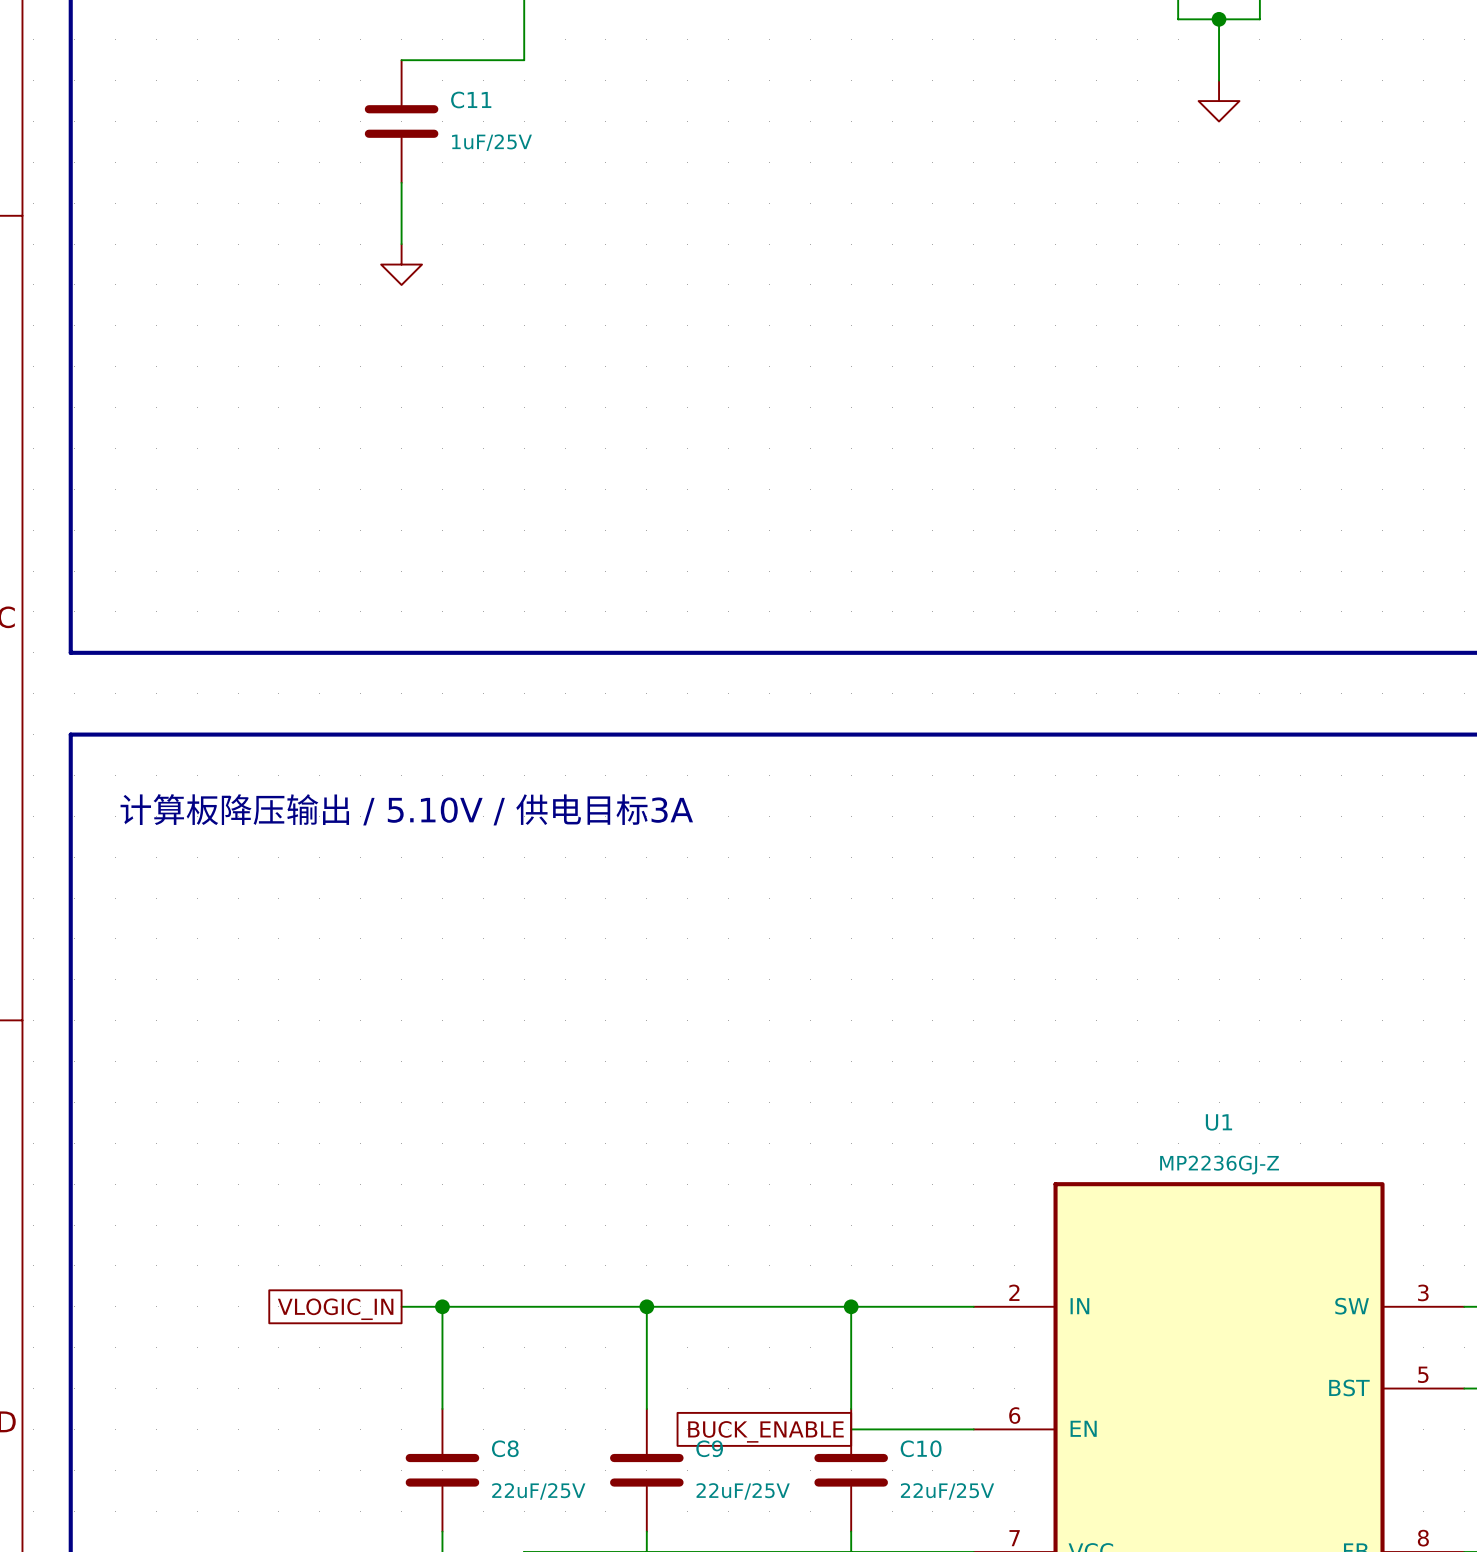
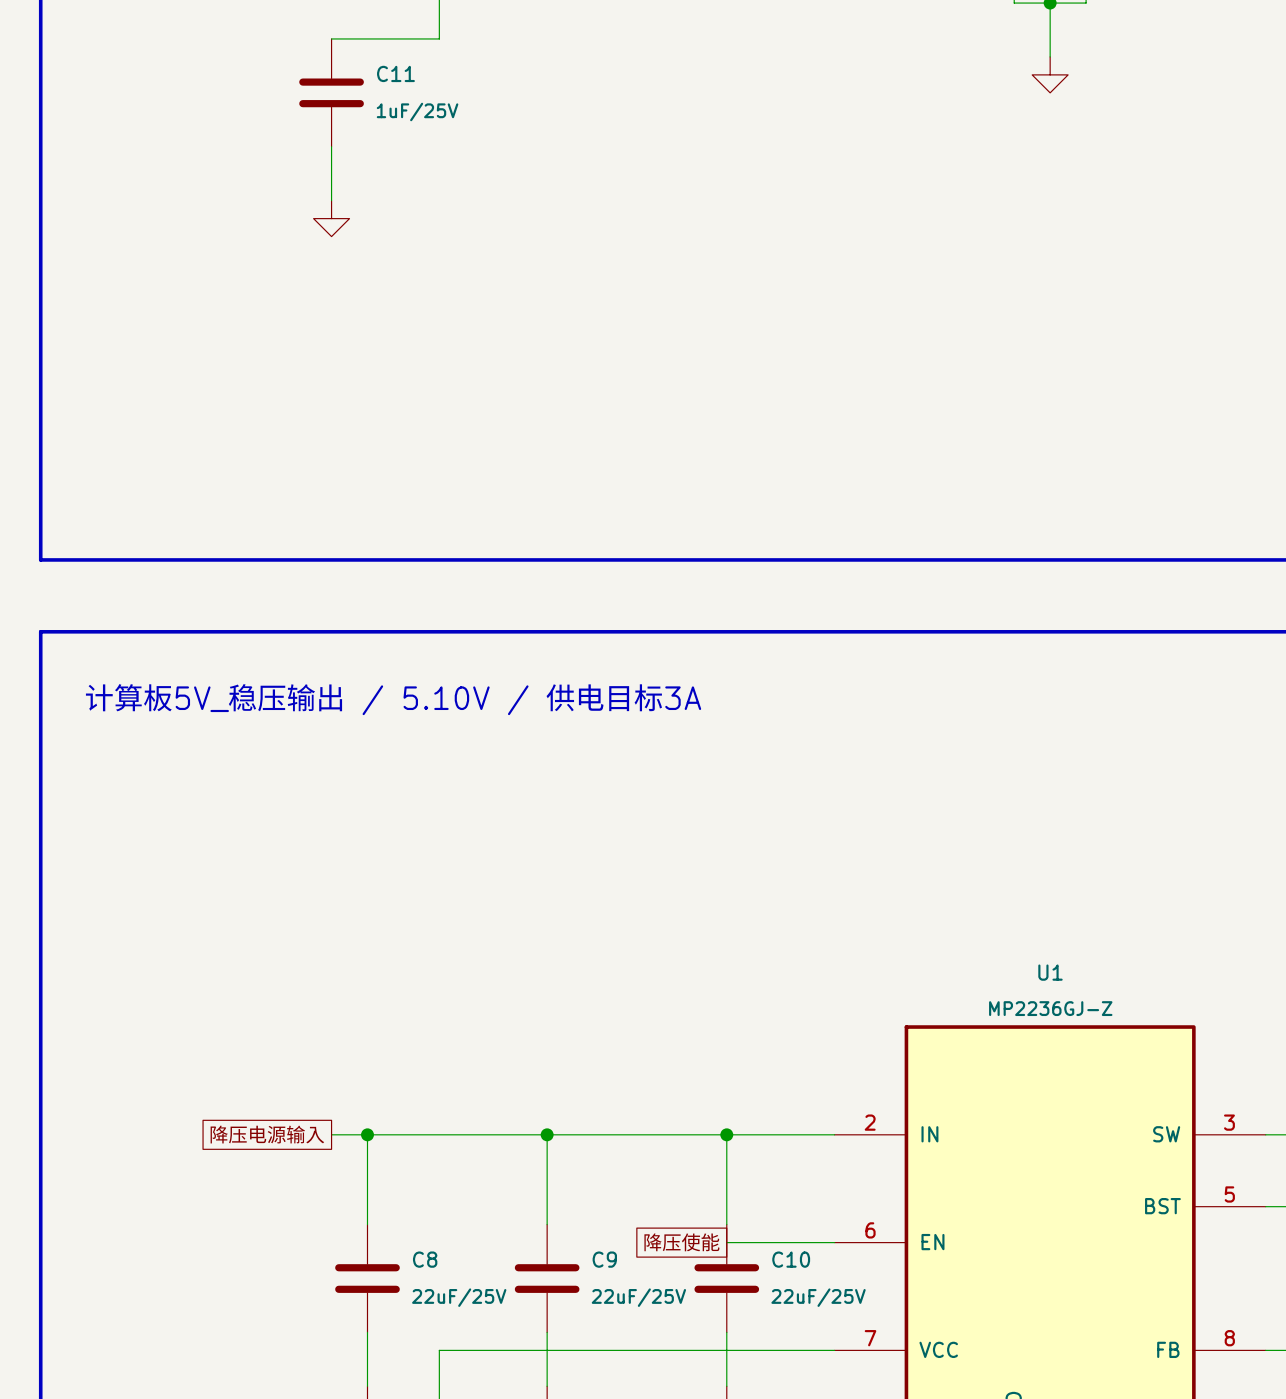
text: 计算板降压输出 / 5.10V / 供电目标3A (406, 809) -> 计算板5V_稳压输出 / 5.10V / 供电目标3A (393, 699)
global label: VLOGIC_IN (335, 1309) -> 降压电源输入 (267, 1134)
global label: BUCK_ENABLE (765, 1431) -> 降压使能 (681, 1242)

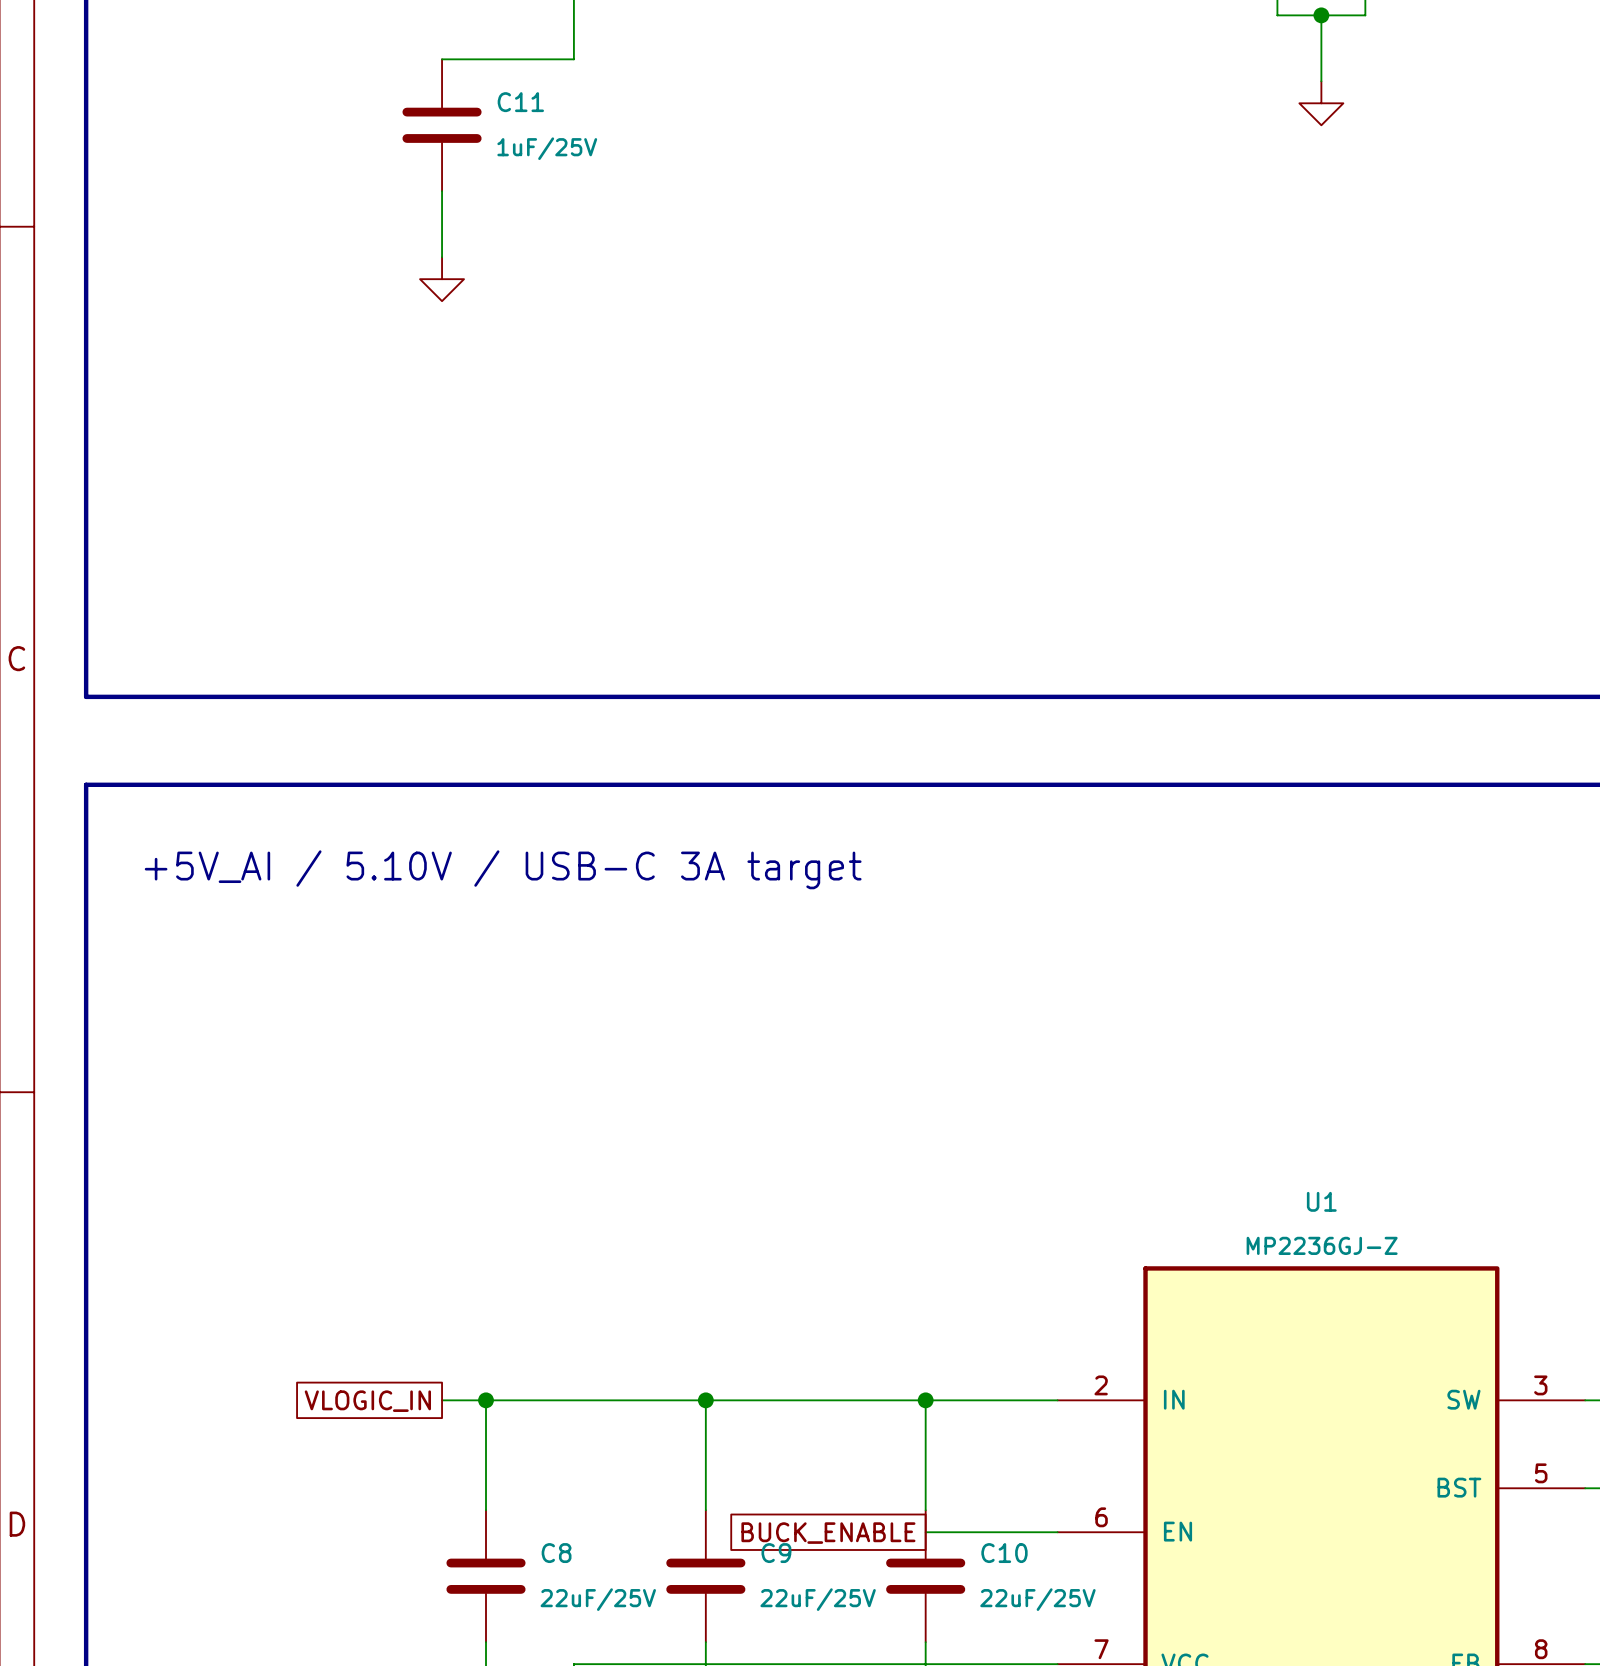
text: 计算板5V_稳压输出 / 5.10V / 供电目标3A (393, 699) -> +5V_AI / 5.10V / USB-C 3A target (503, 869)
global label: 降压电源输入 (267, 1134) -> VLOGIC_IN (367, 1401)
global label: 降压使能 (681, 1242) -> BUCK_ENABLE (828, 1533)

